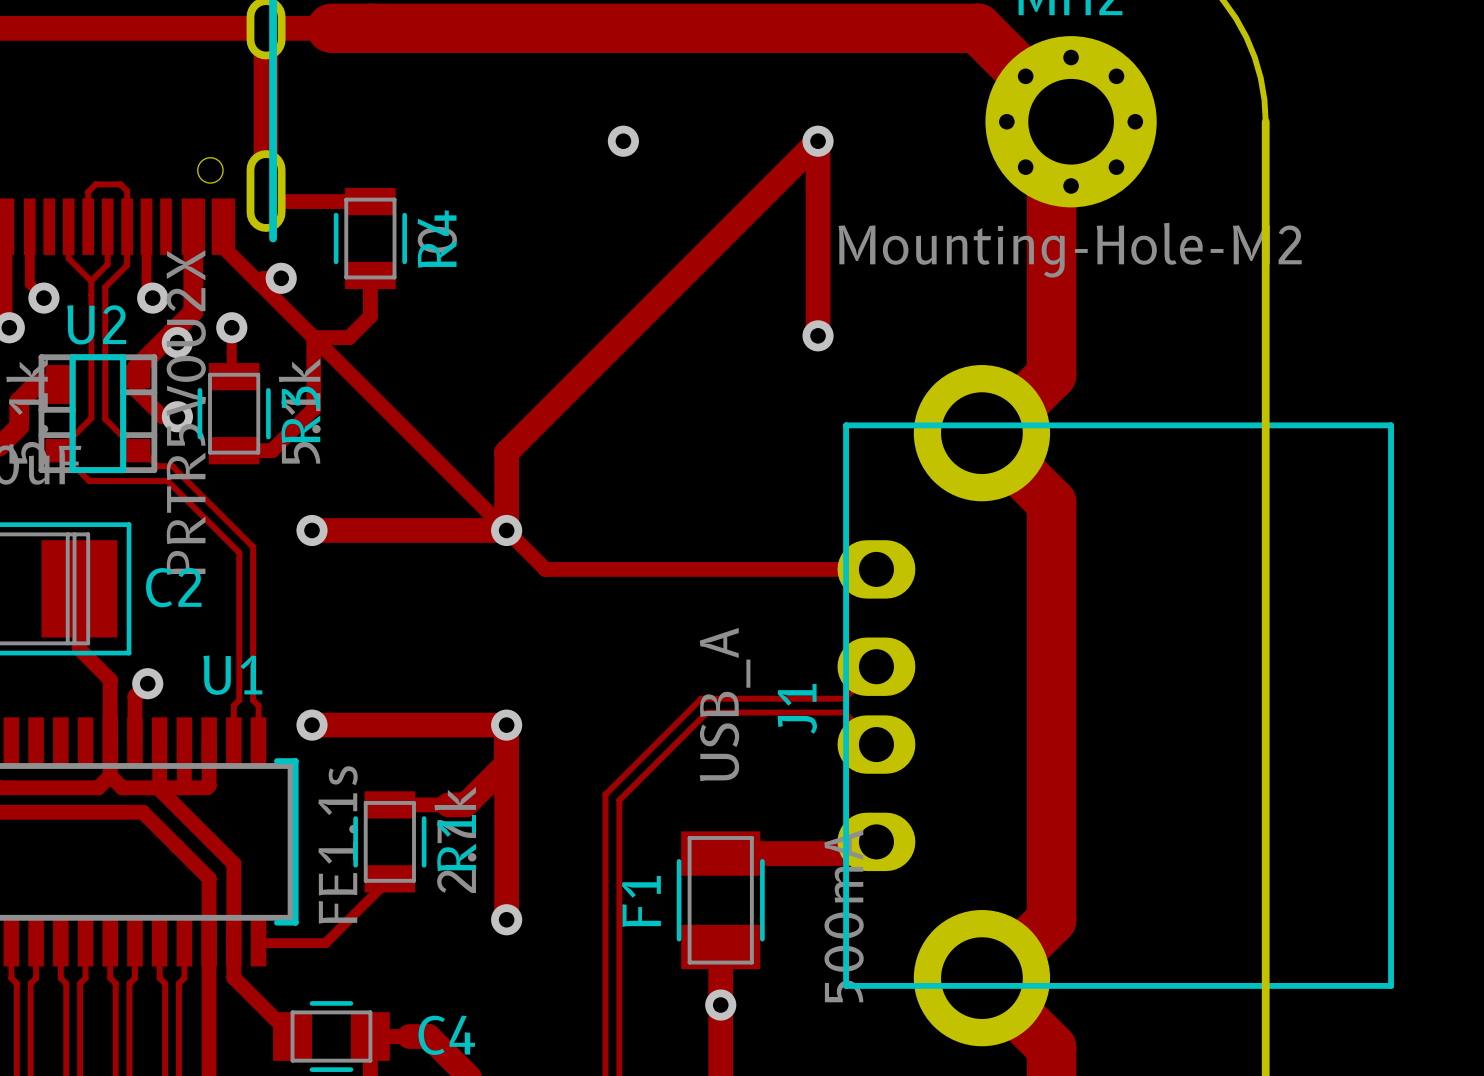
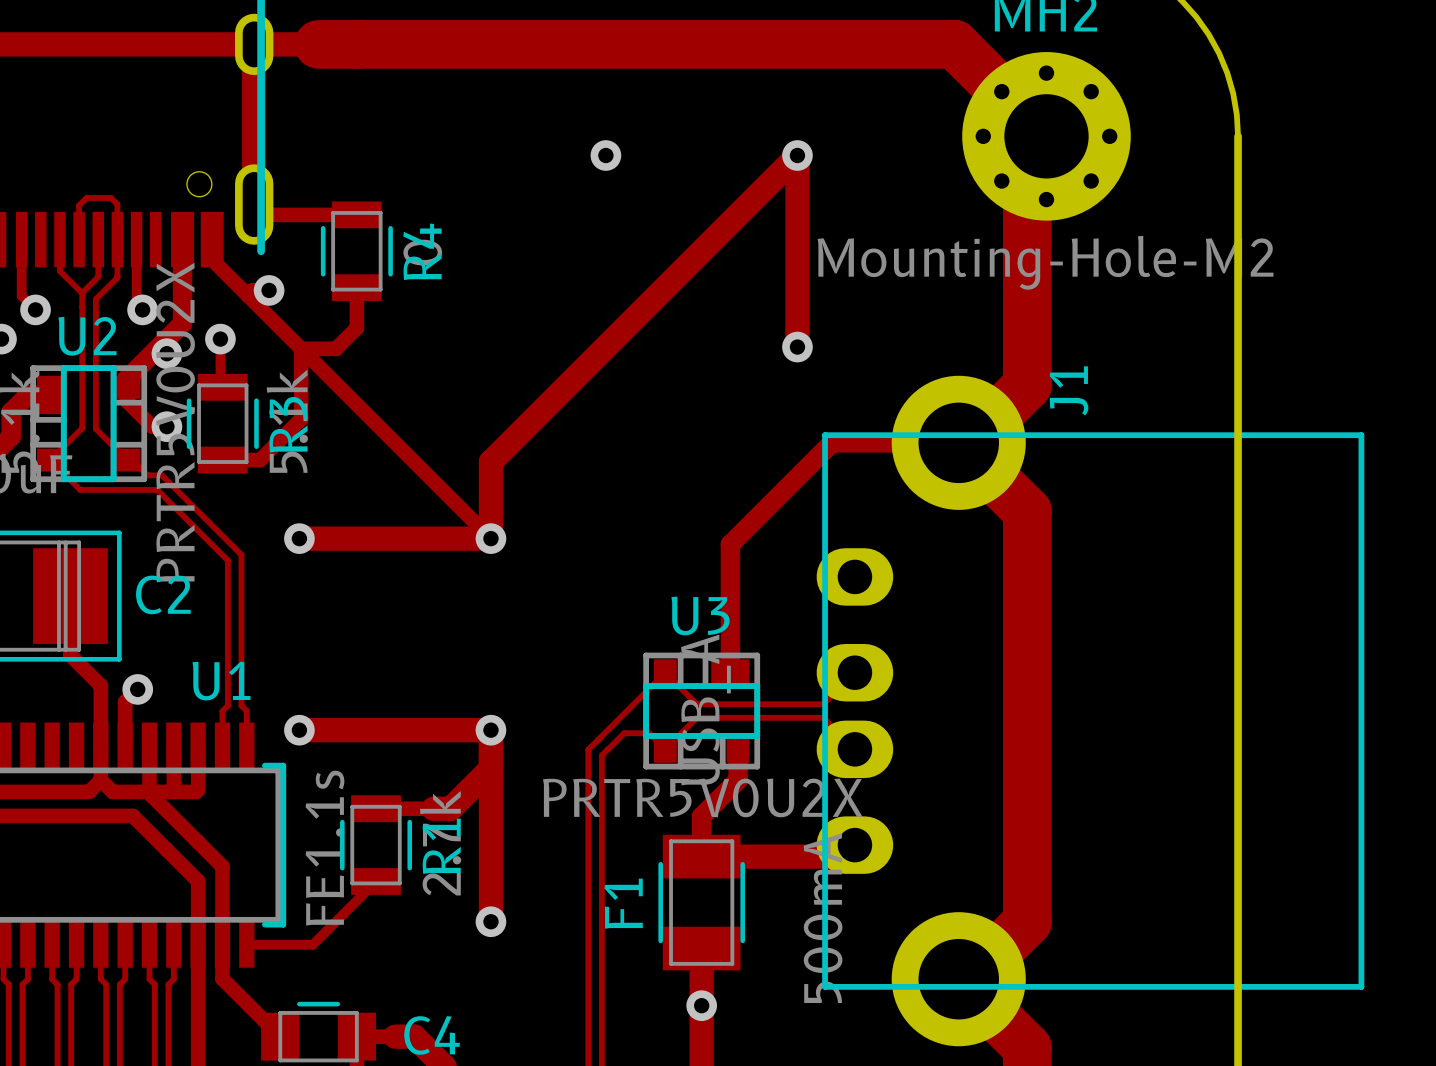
track: none -> (958, 442) (831, 442) (730, 544) (730, 672)
track: (506, 530) (545, 569) (876, 569) -> none
track: (715, 698) (701, 698) (605, 794) -> (696, 704) (665, 672) (588, 749) (588, 798)
U3: none -> PRTR5V0U2X (701, 711)
J1 name position: J1 (797, 708) -> J1 (1069, 390)
track: (715, 712) (707, 712) (619, 800) -> (696, 717) (665, 749) (649, 733) (624, 733) (601, 755) (601, 804)
track: none -> (738, 749) (738, 779) (701, 816) (701, 856)

